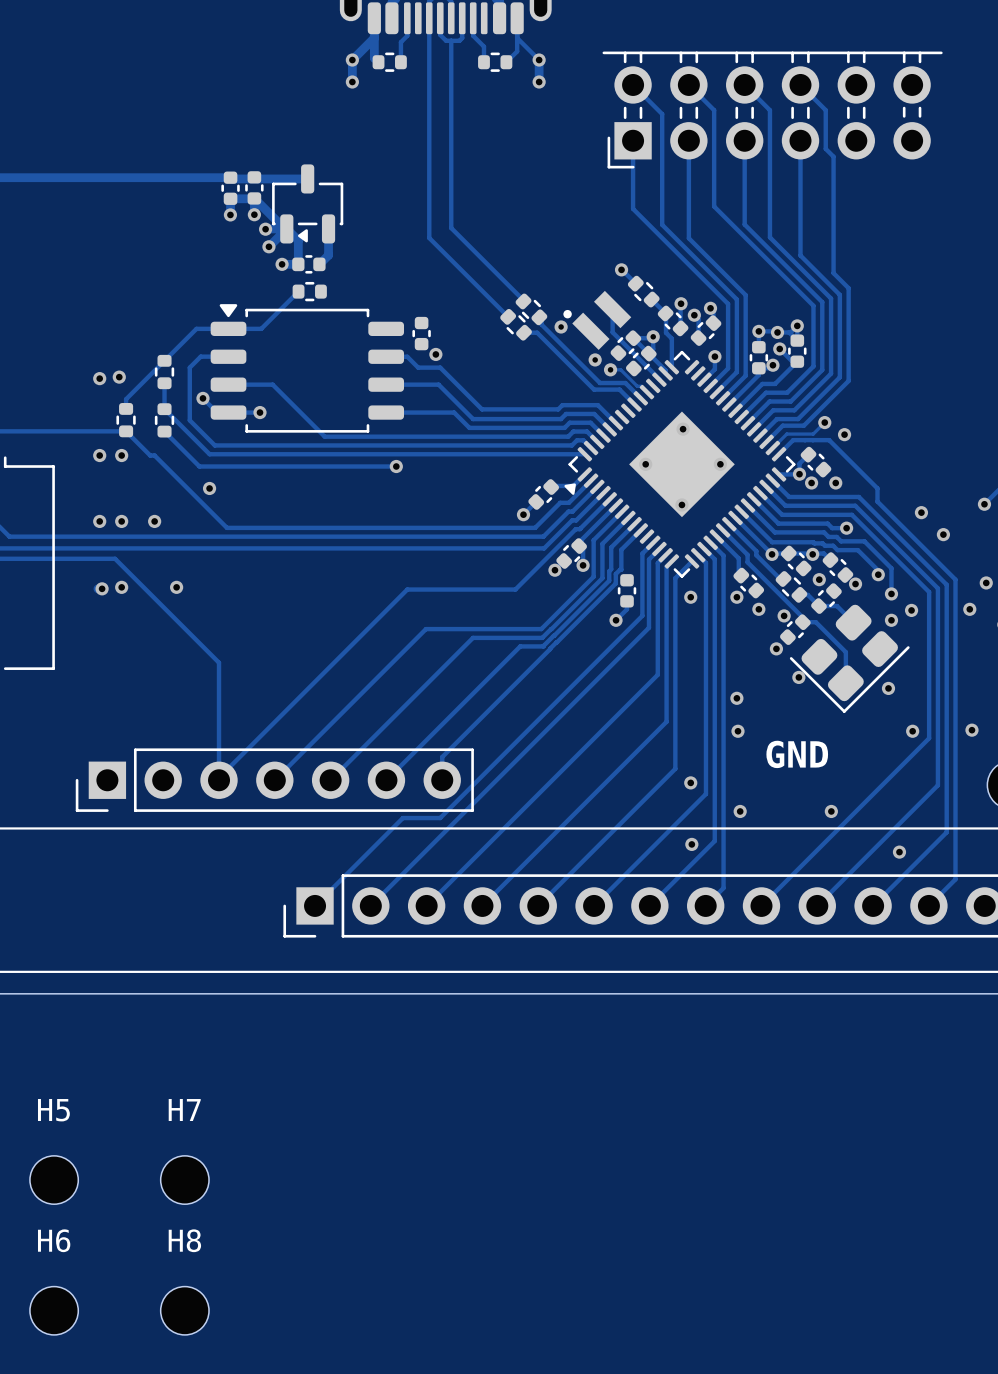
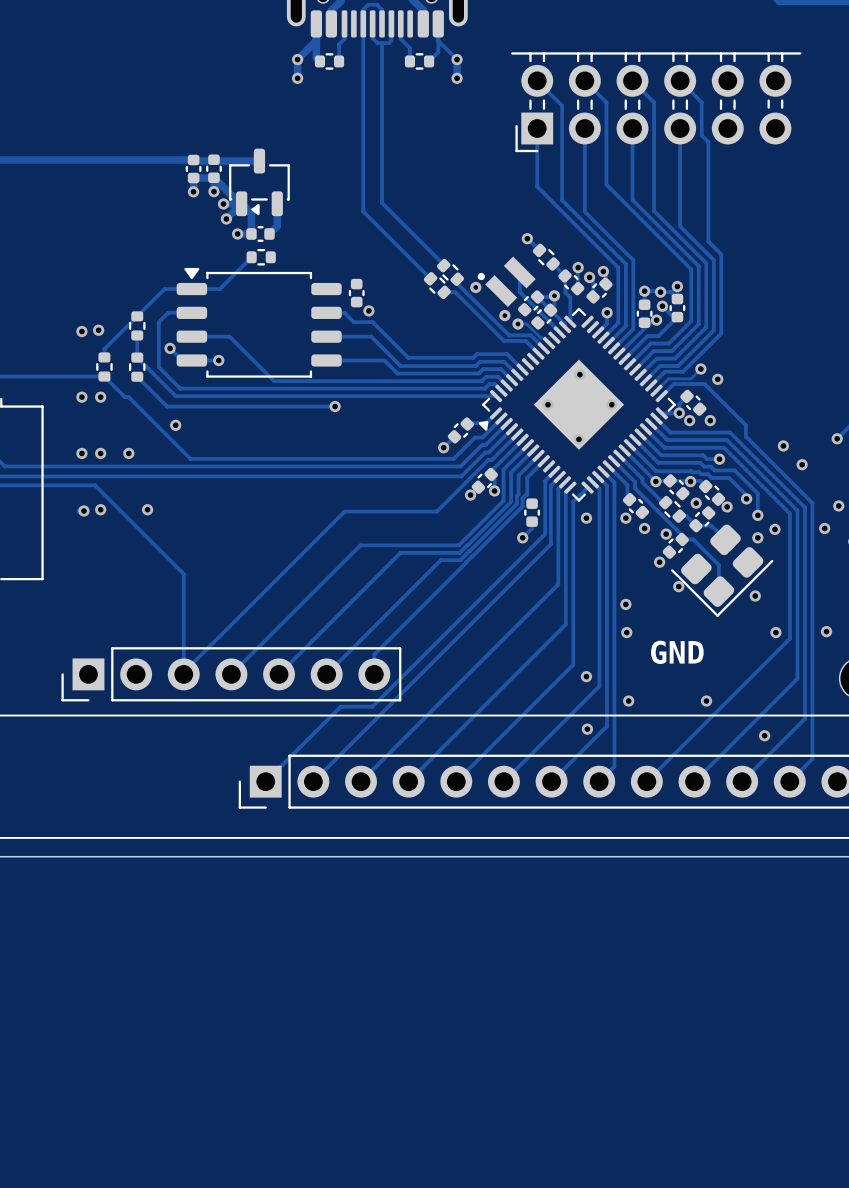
H5: (54, 1180) -> none
H7: (184, 1180) -> none
H6: (54, 1310) -> none
H8: (184, 1310) -> none

